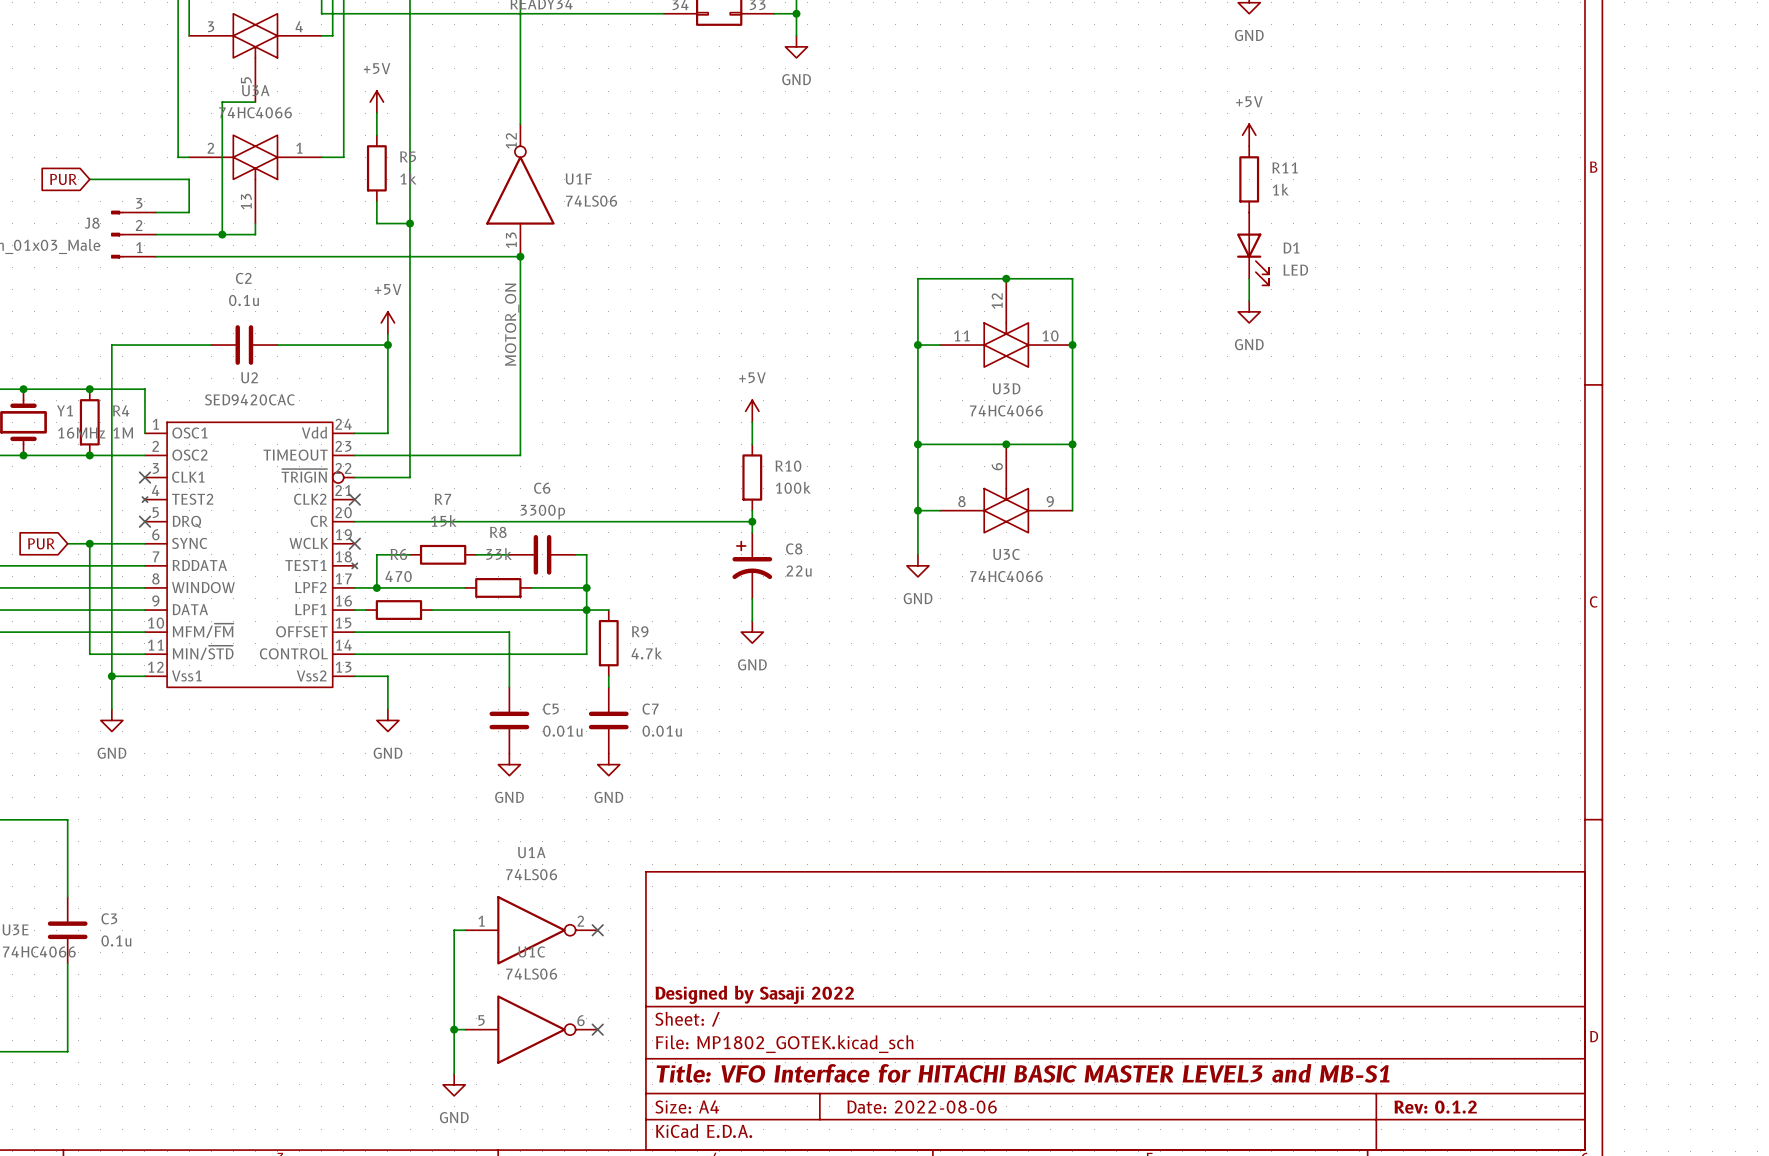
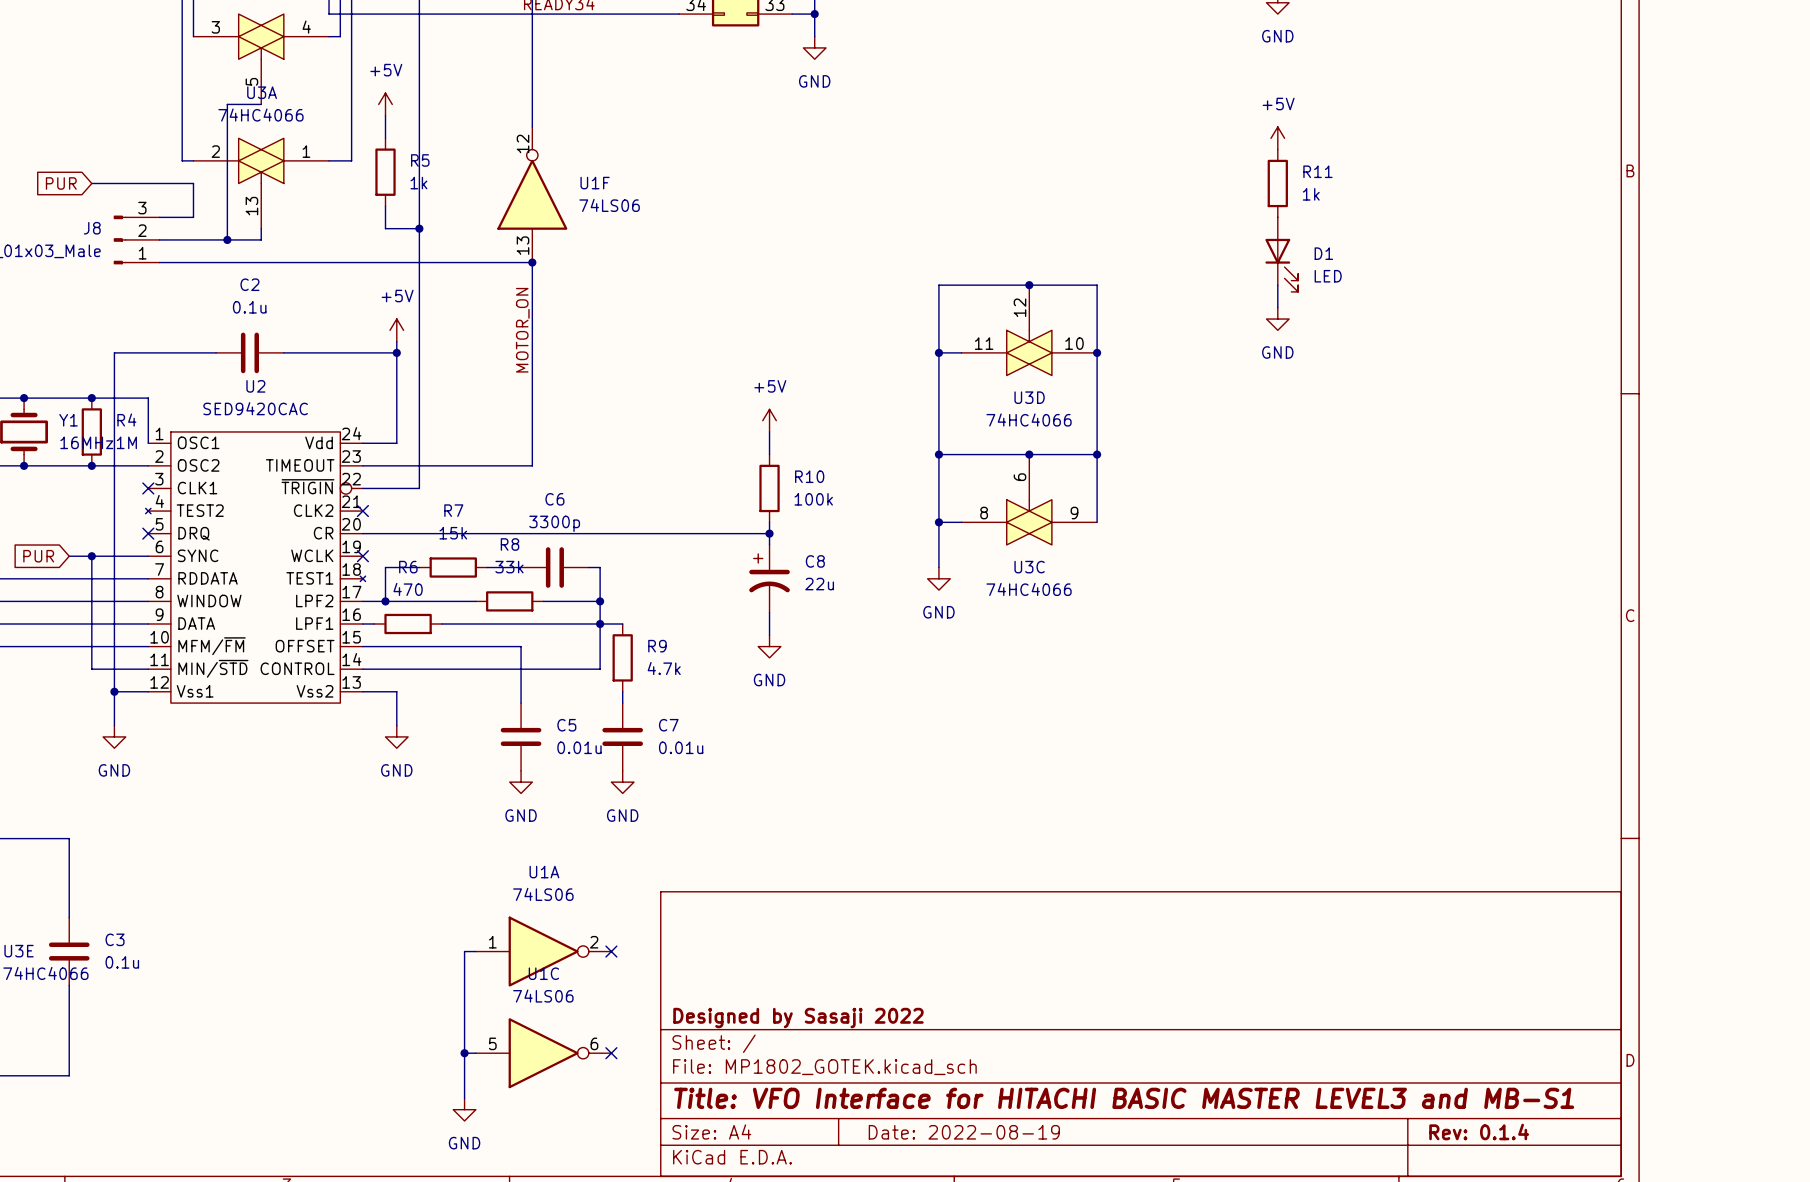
title block: Date: 2022-08-06 (922, 1107) -> Date: 2022-08-19 (964, 1132)
title block: Rev: 0.1.2 (1435, 1107) -> Rev: 0.1.4 (1479, 1131)

